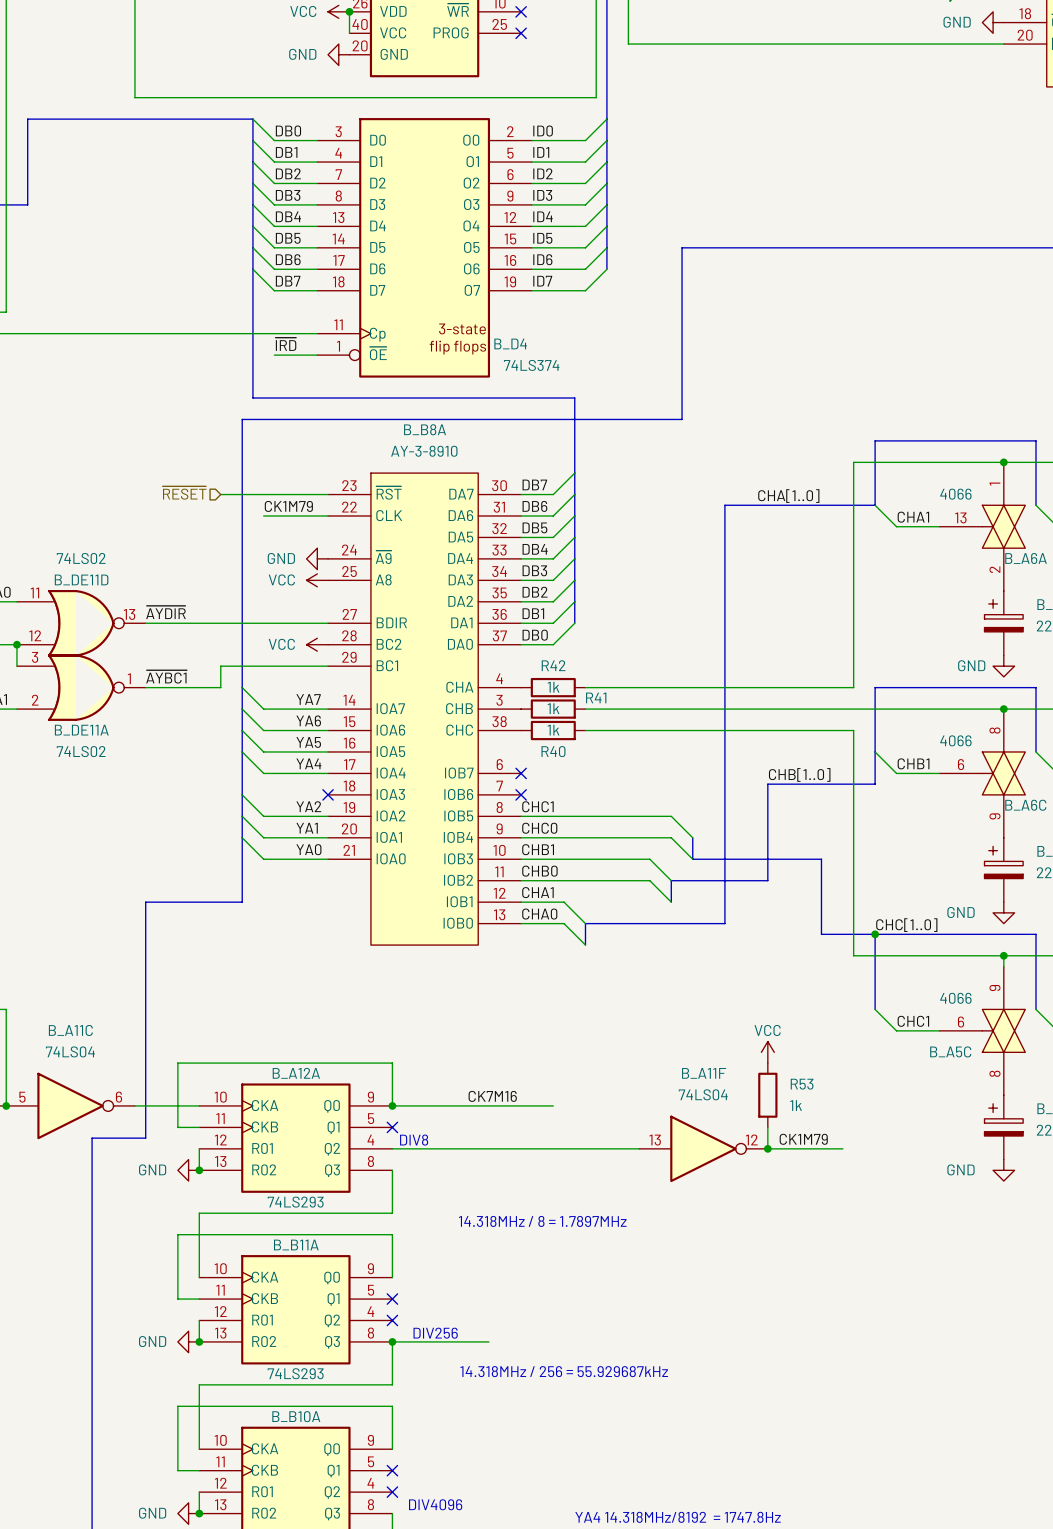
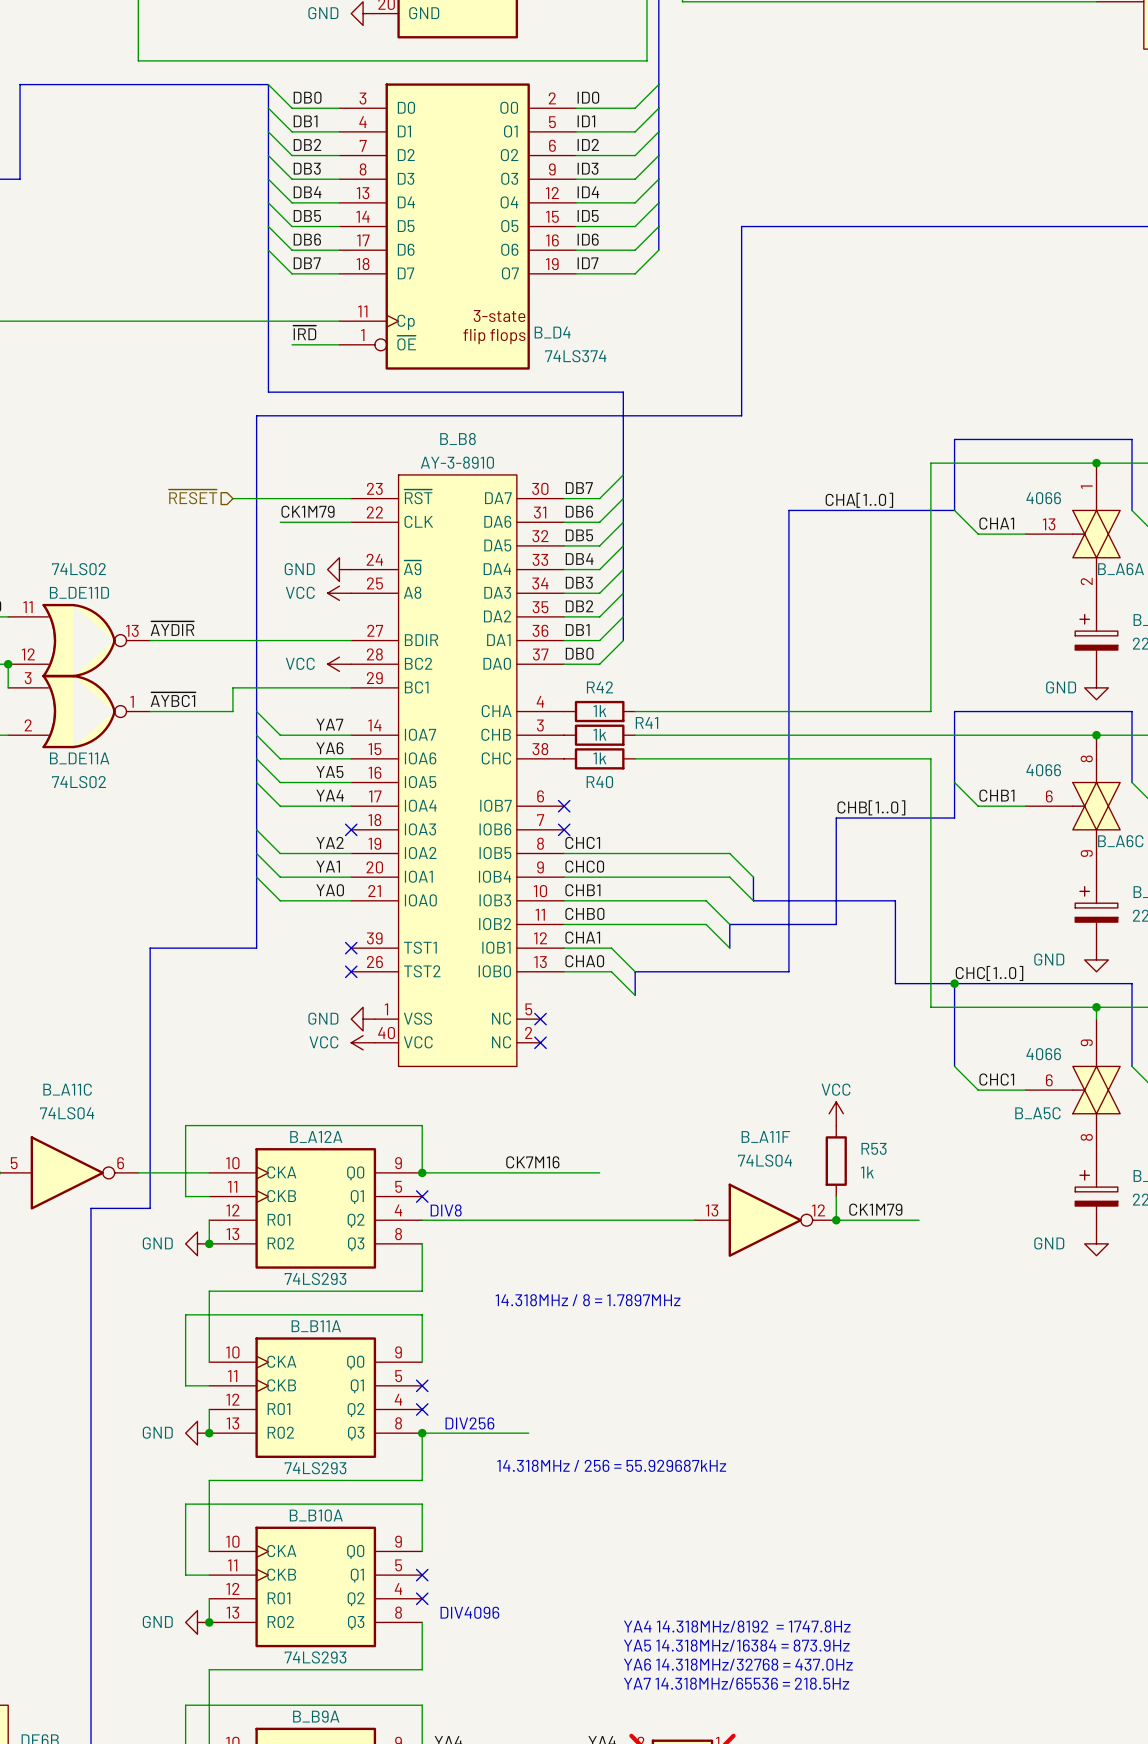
B_B8A: AY-3-8910 (424, 709) -> none
B_B8: none -> AY-3-8910 (457, 770)
no-connect mark: none -> (351, 948)
no-connect mark: none -> (351, 971)
power symbol: none -> GND (363, 1019)
no-connect mark: none -> (540, 1019)
power symbol: none -> VCC (363, 1042)
no-connect mark: none -> (540, 1042)

